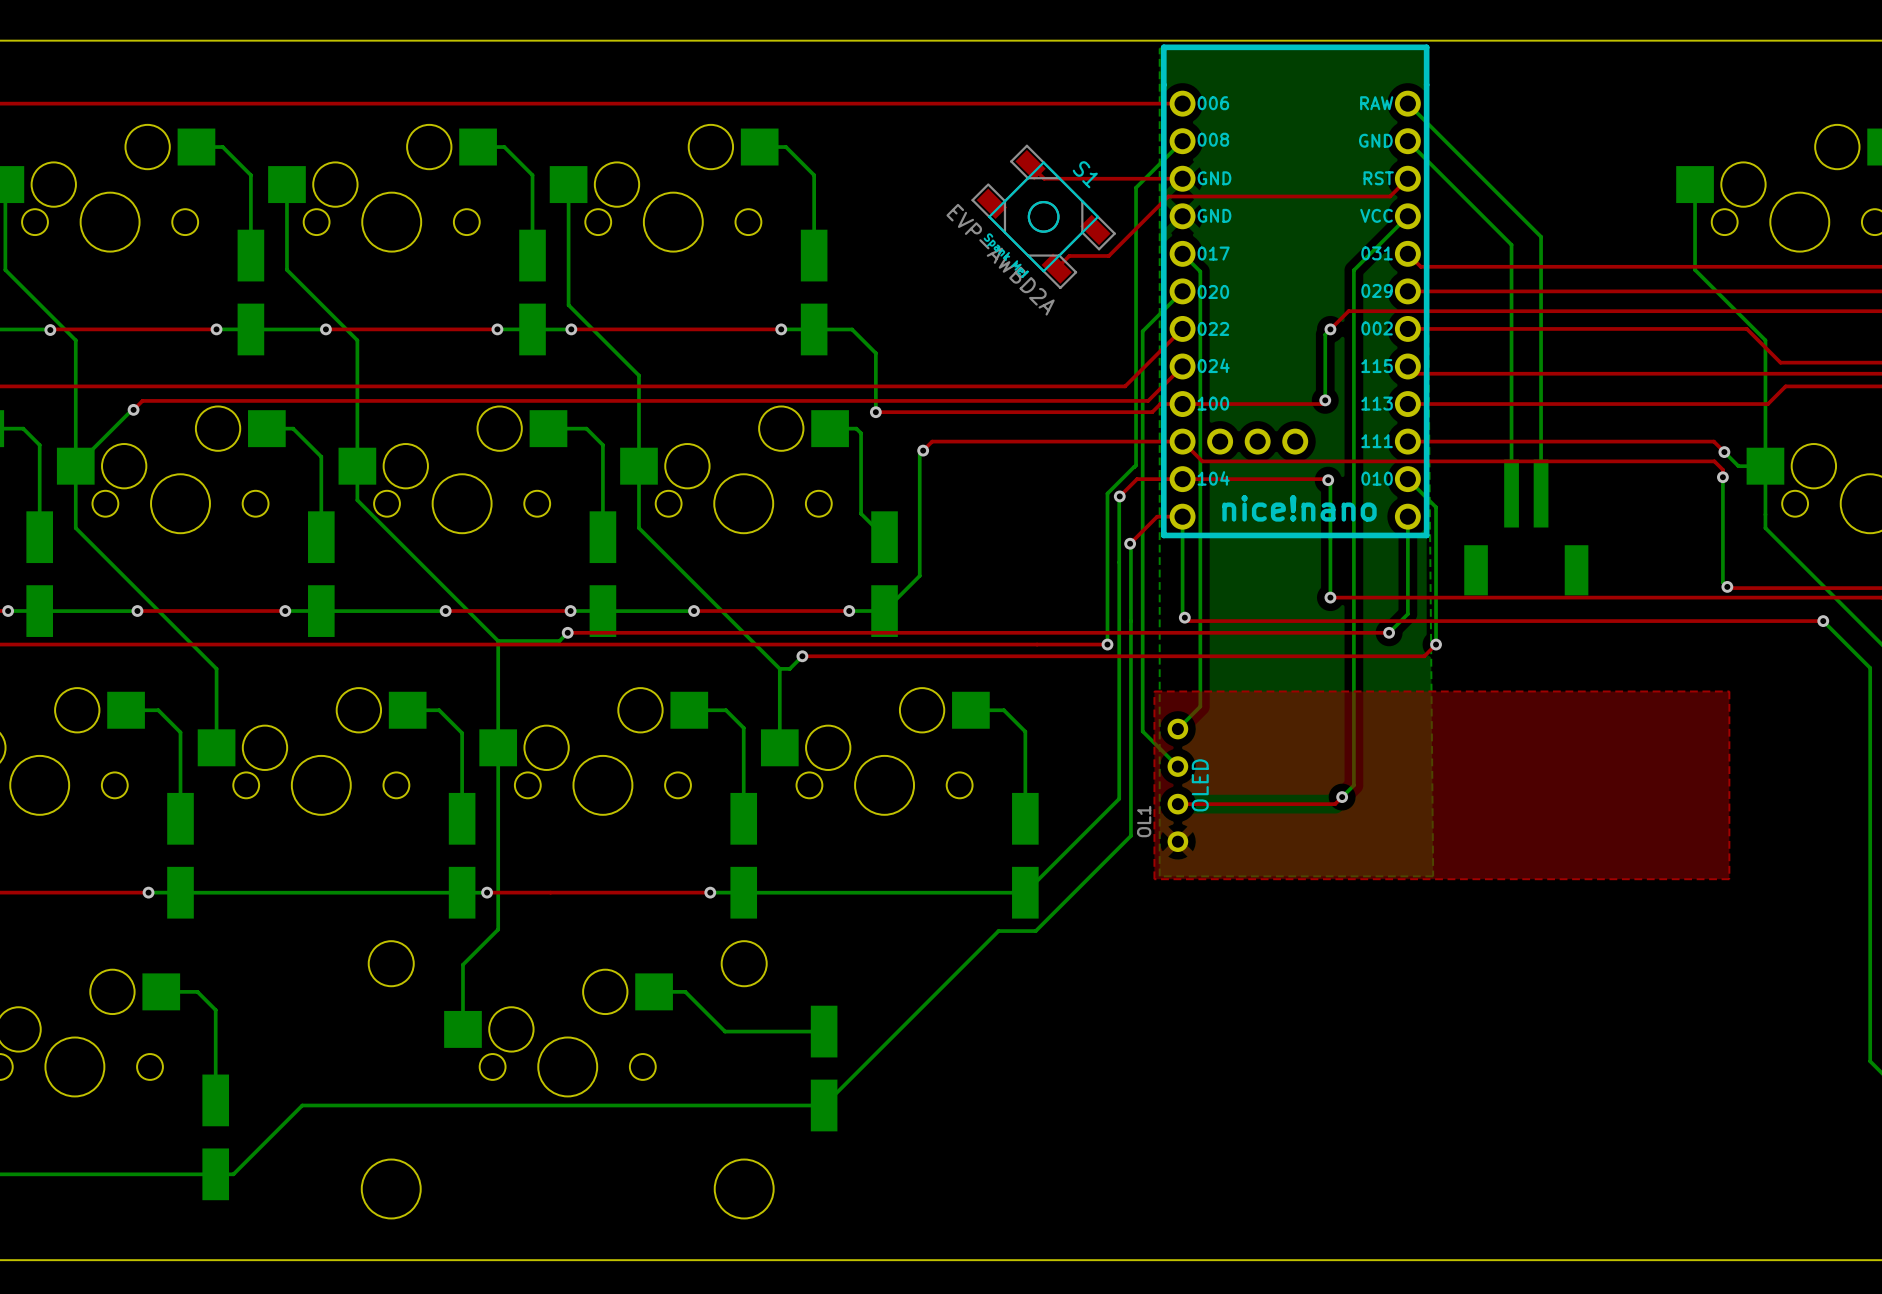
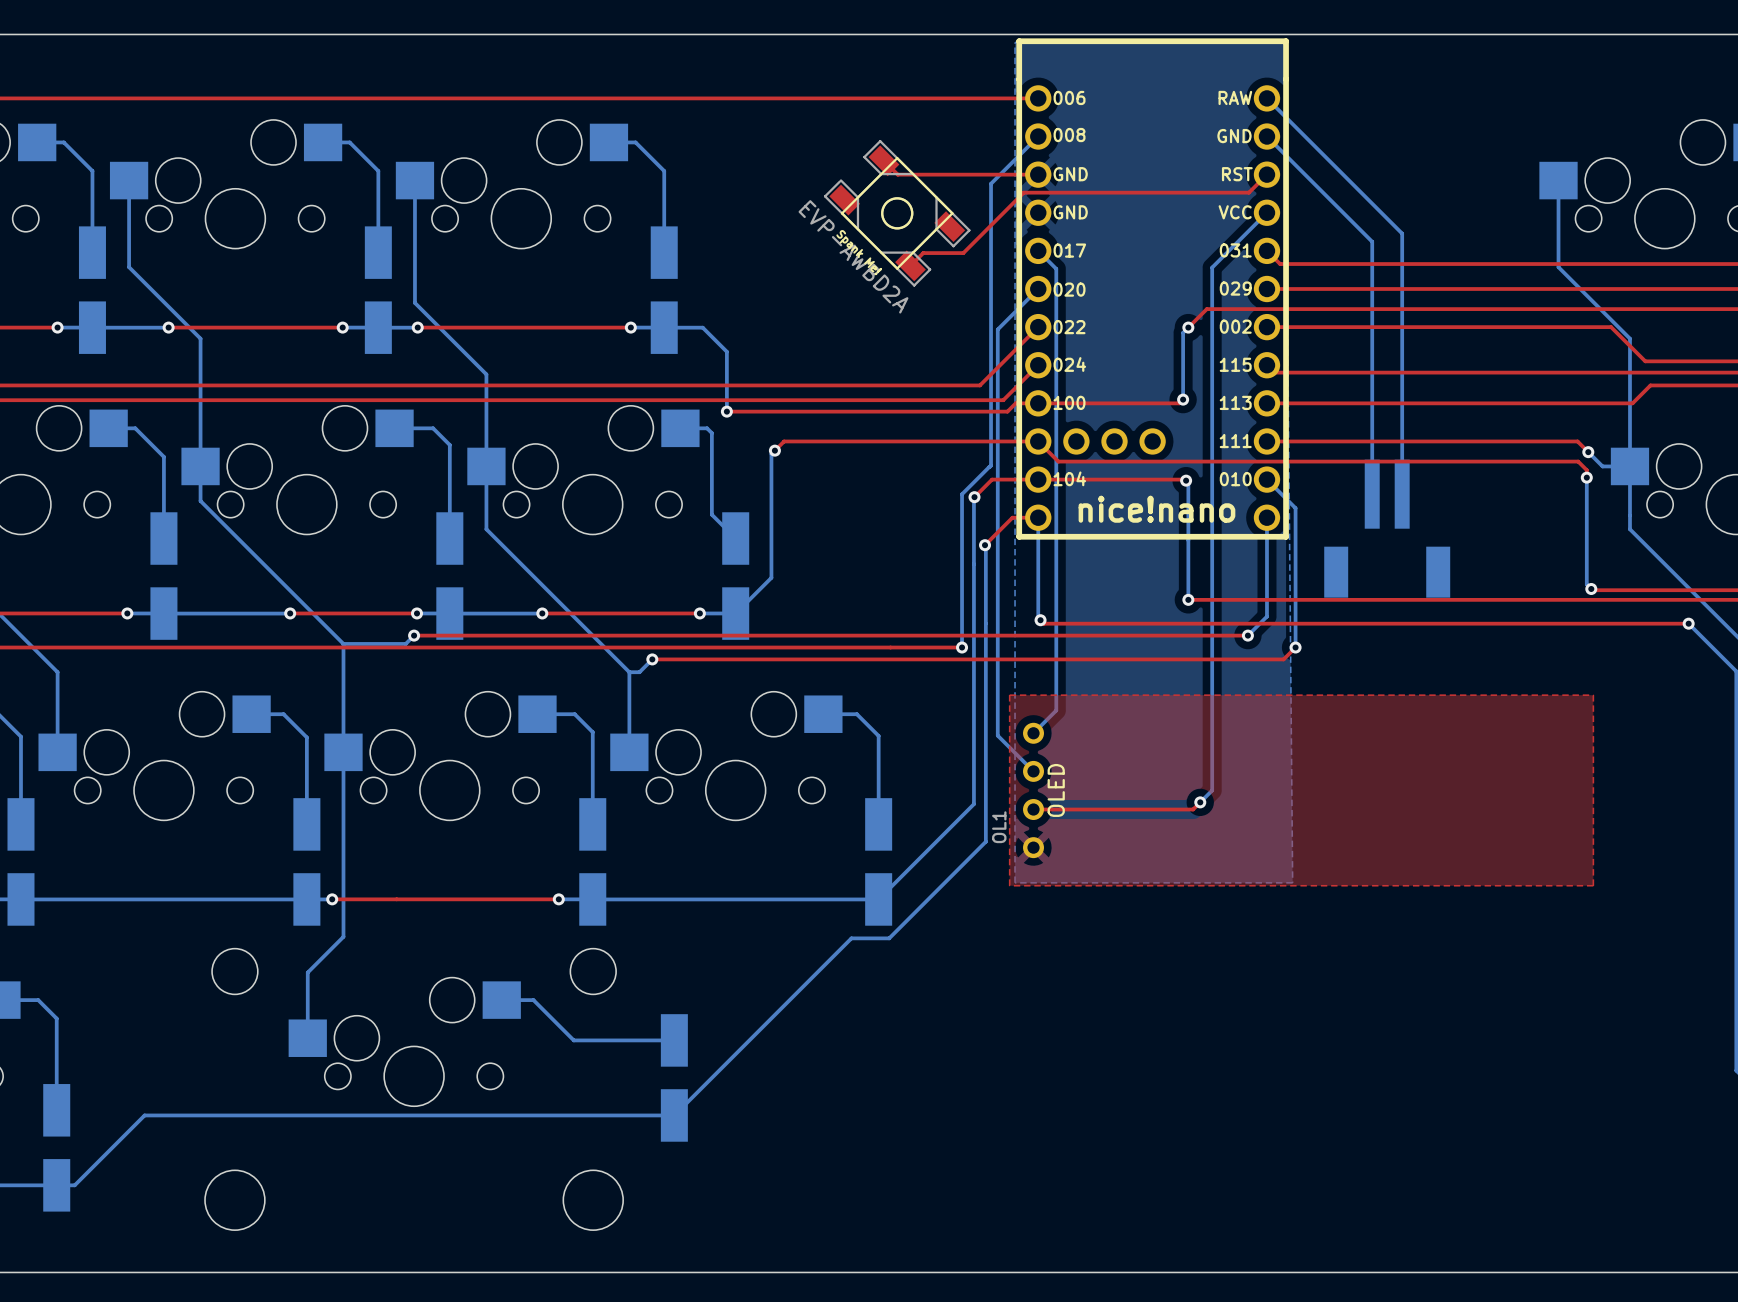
S1 name: S1 (1085, 174) -> none

